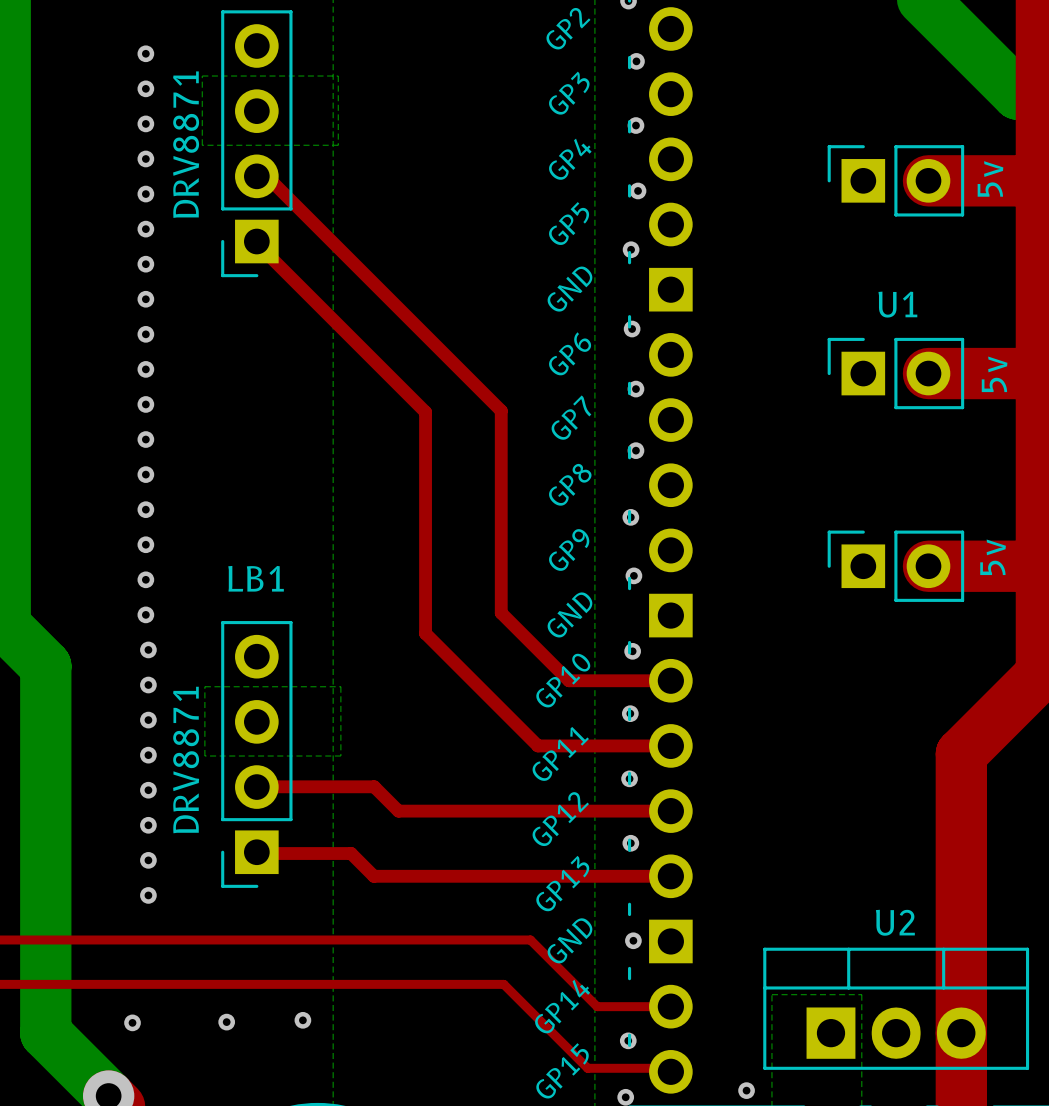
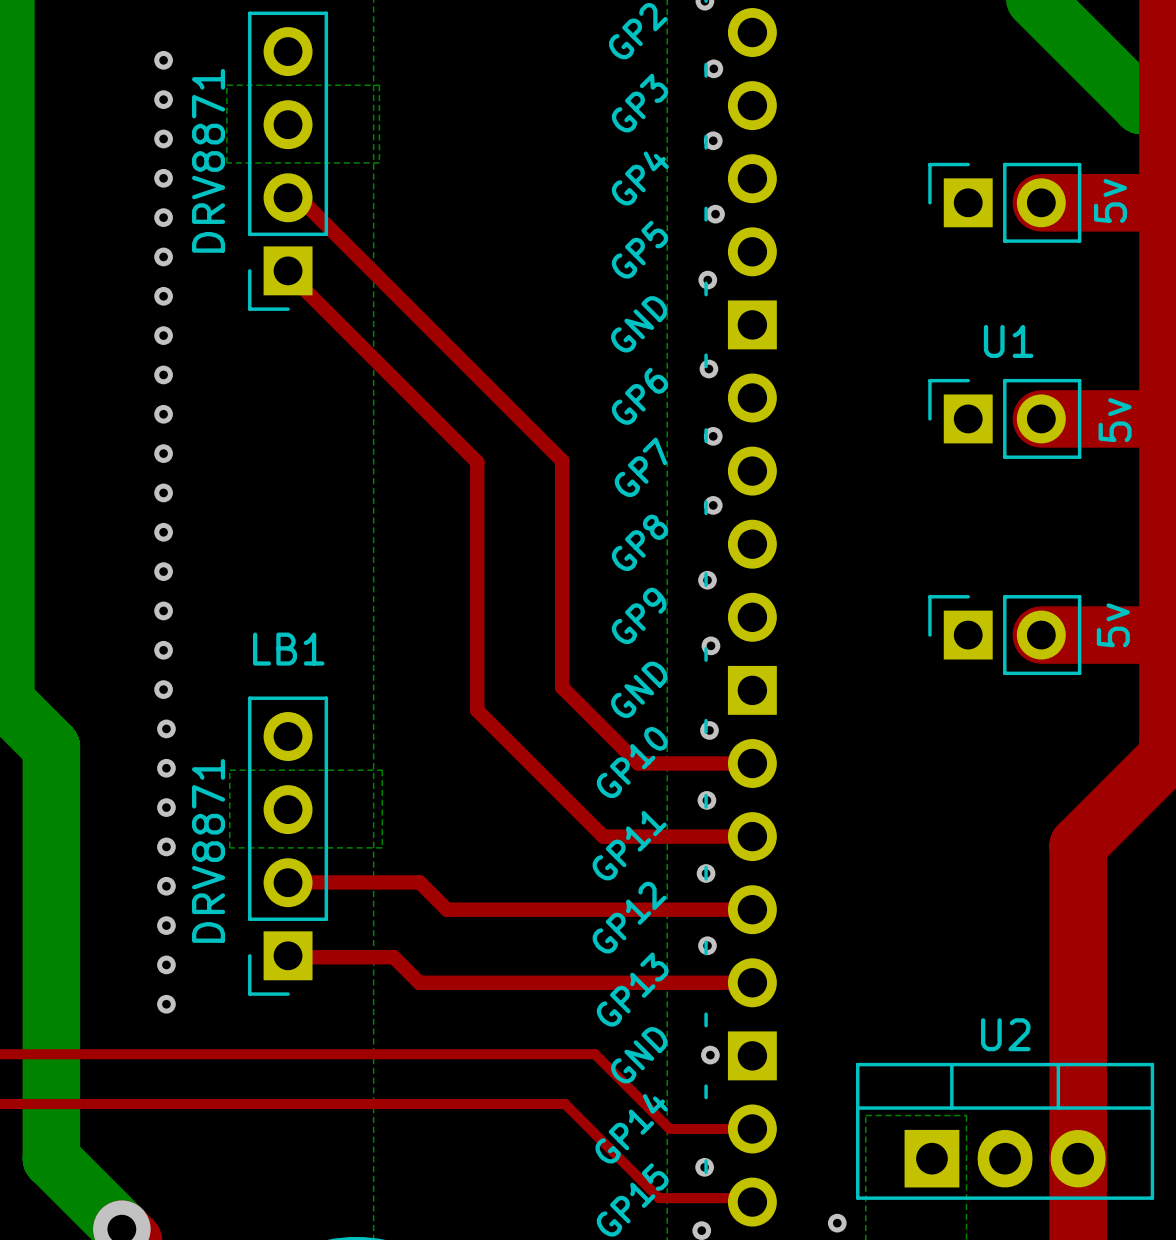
via: (302, 1020) -> none
via: (132, 1022) -> none
via: (226, 1022) -> none

